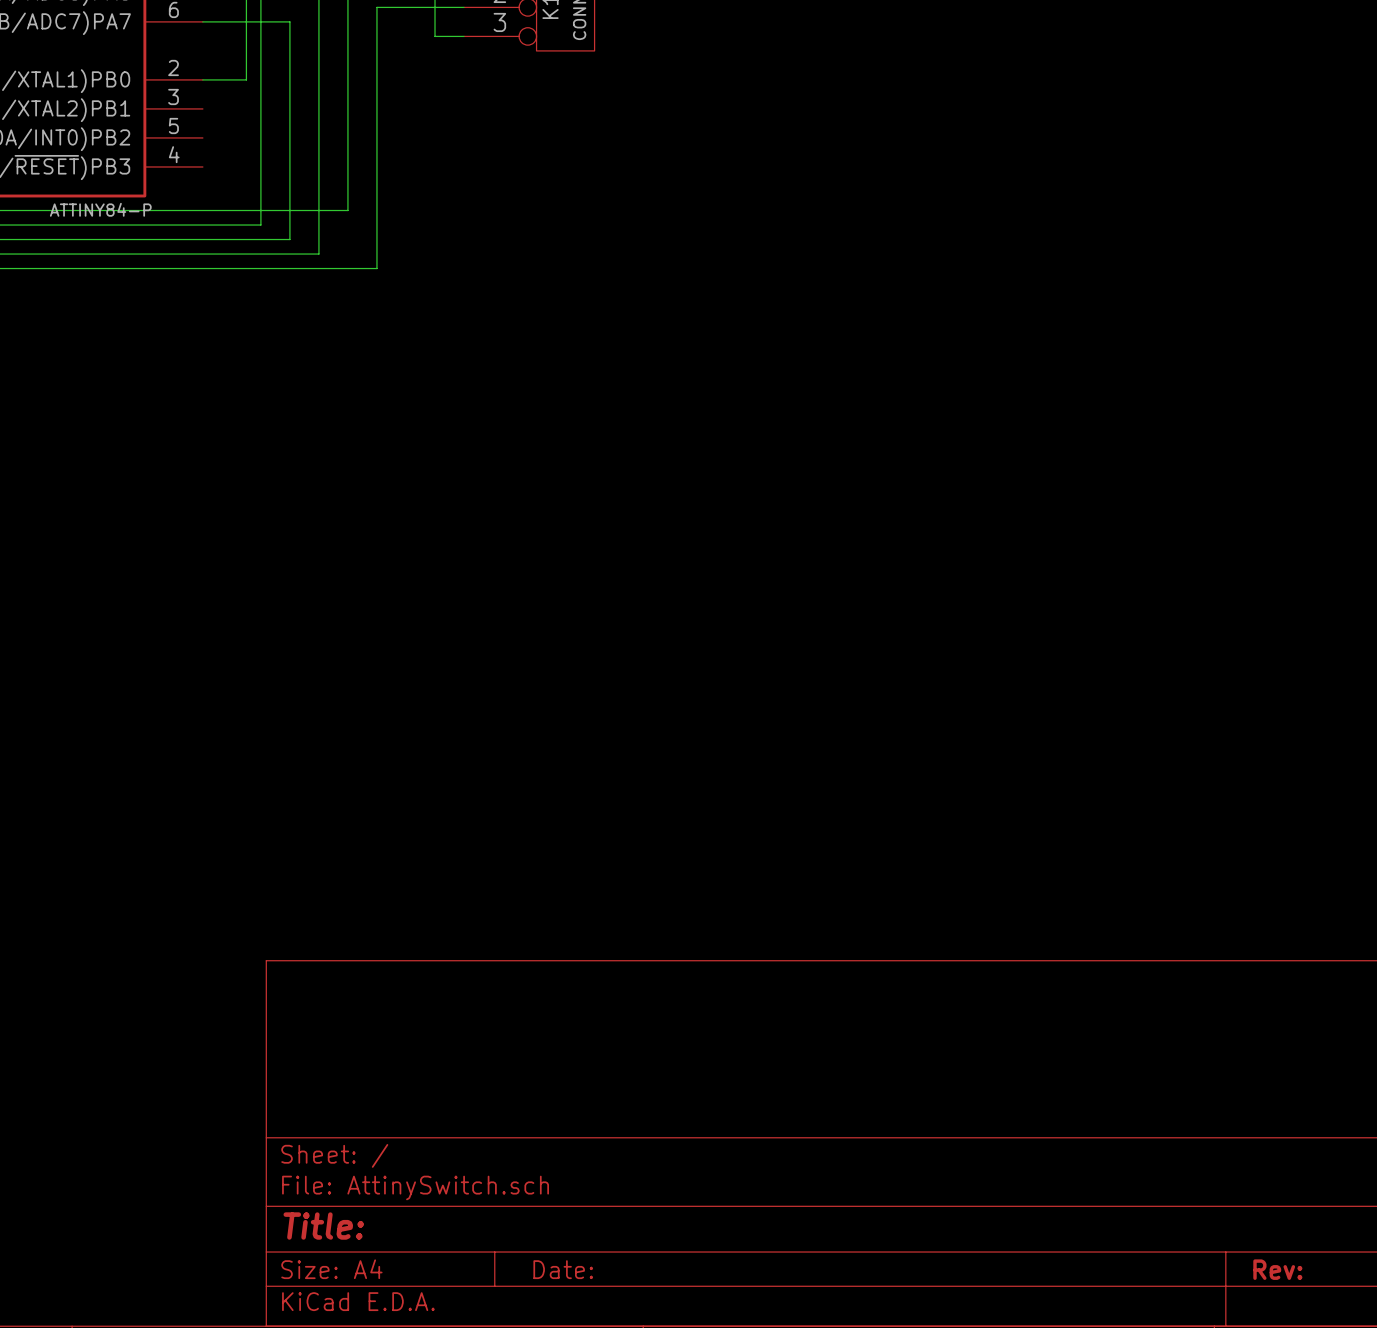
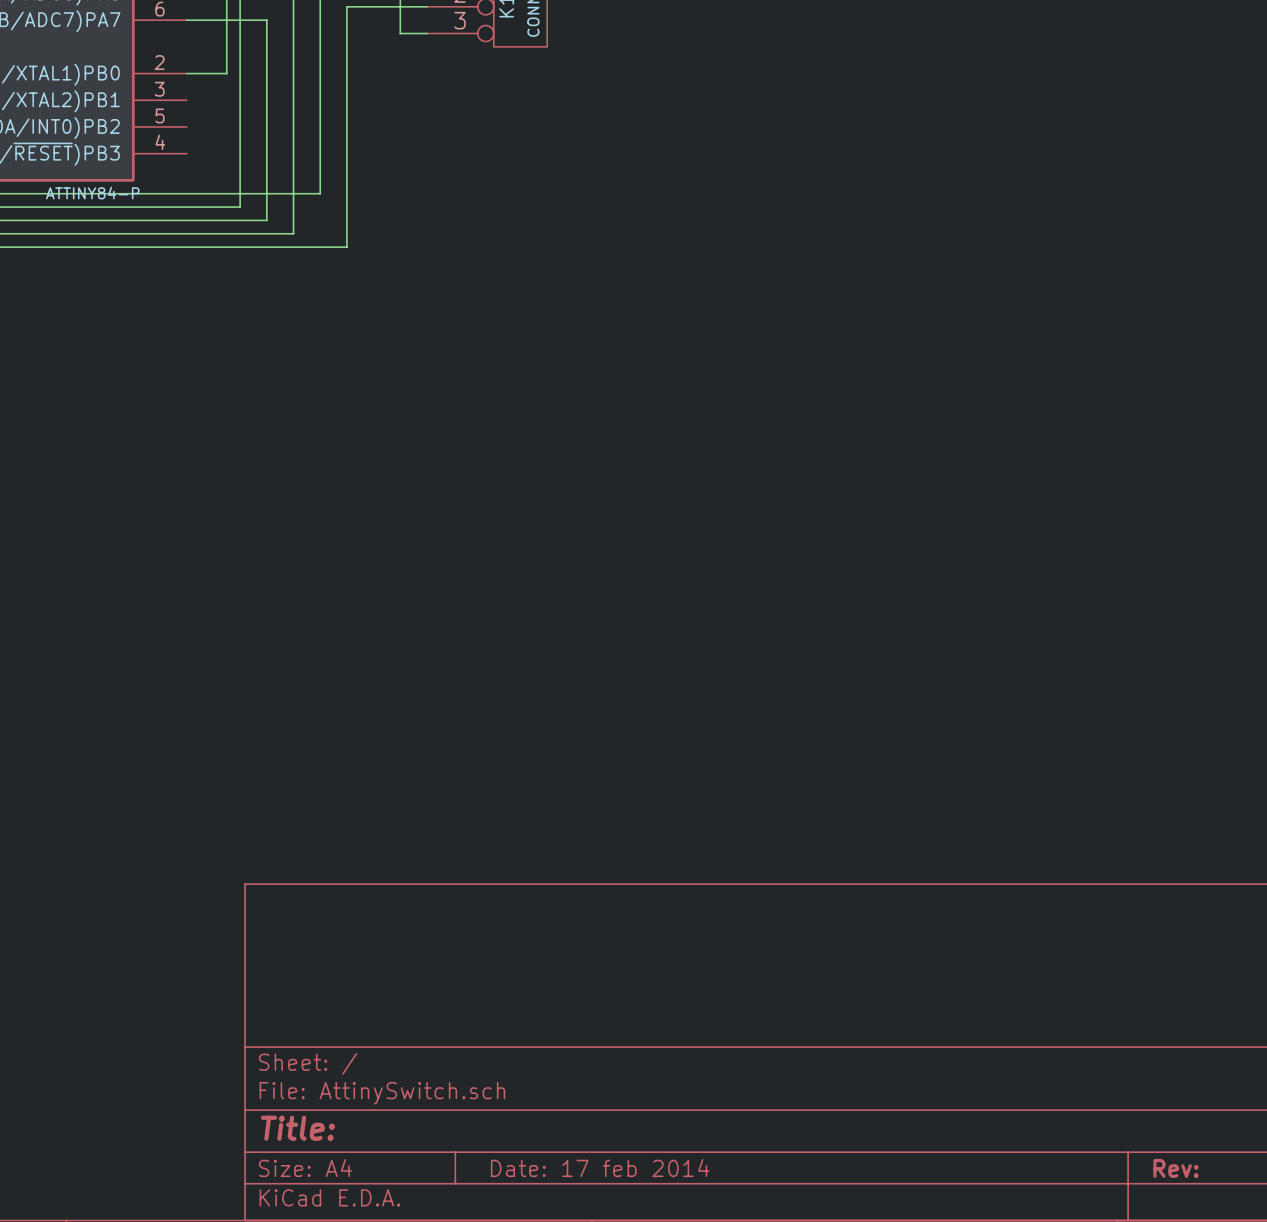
title block: Date: (563, 1269) -> Date: 17 feb 2014 (600, 1168)

